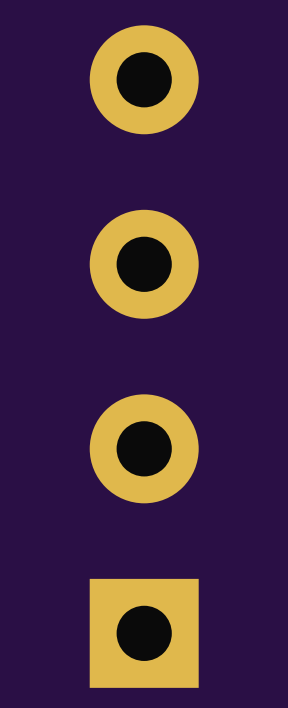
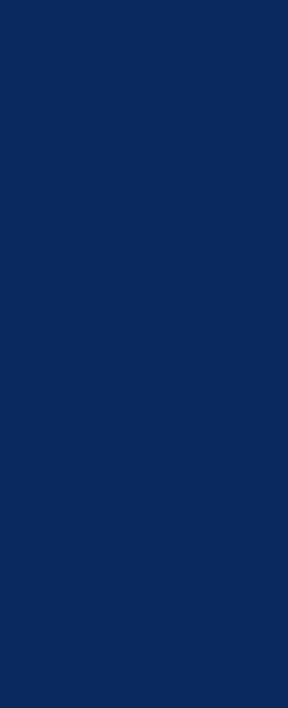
part: (144, 356) -> none

